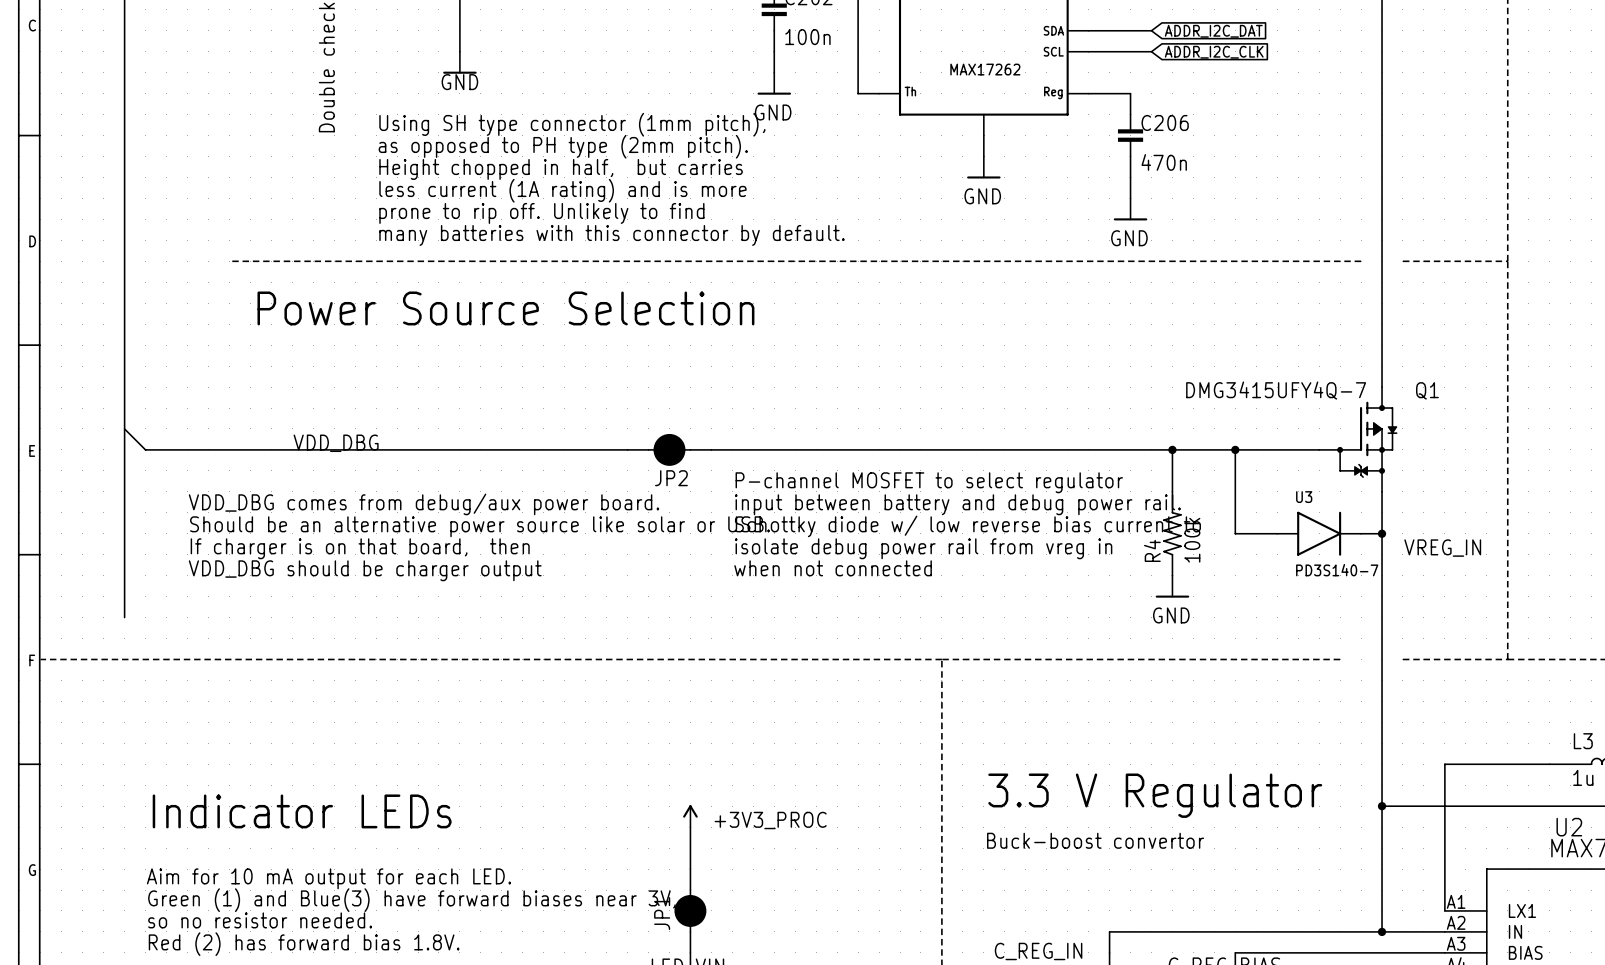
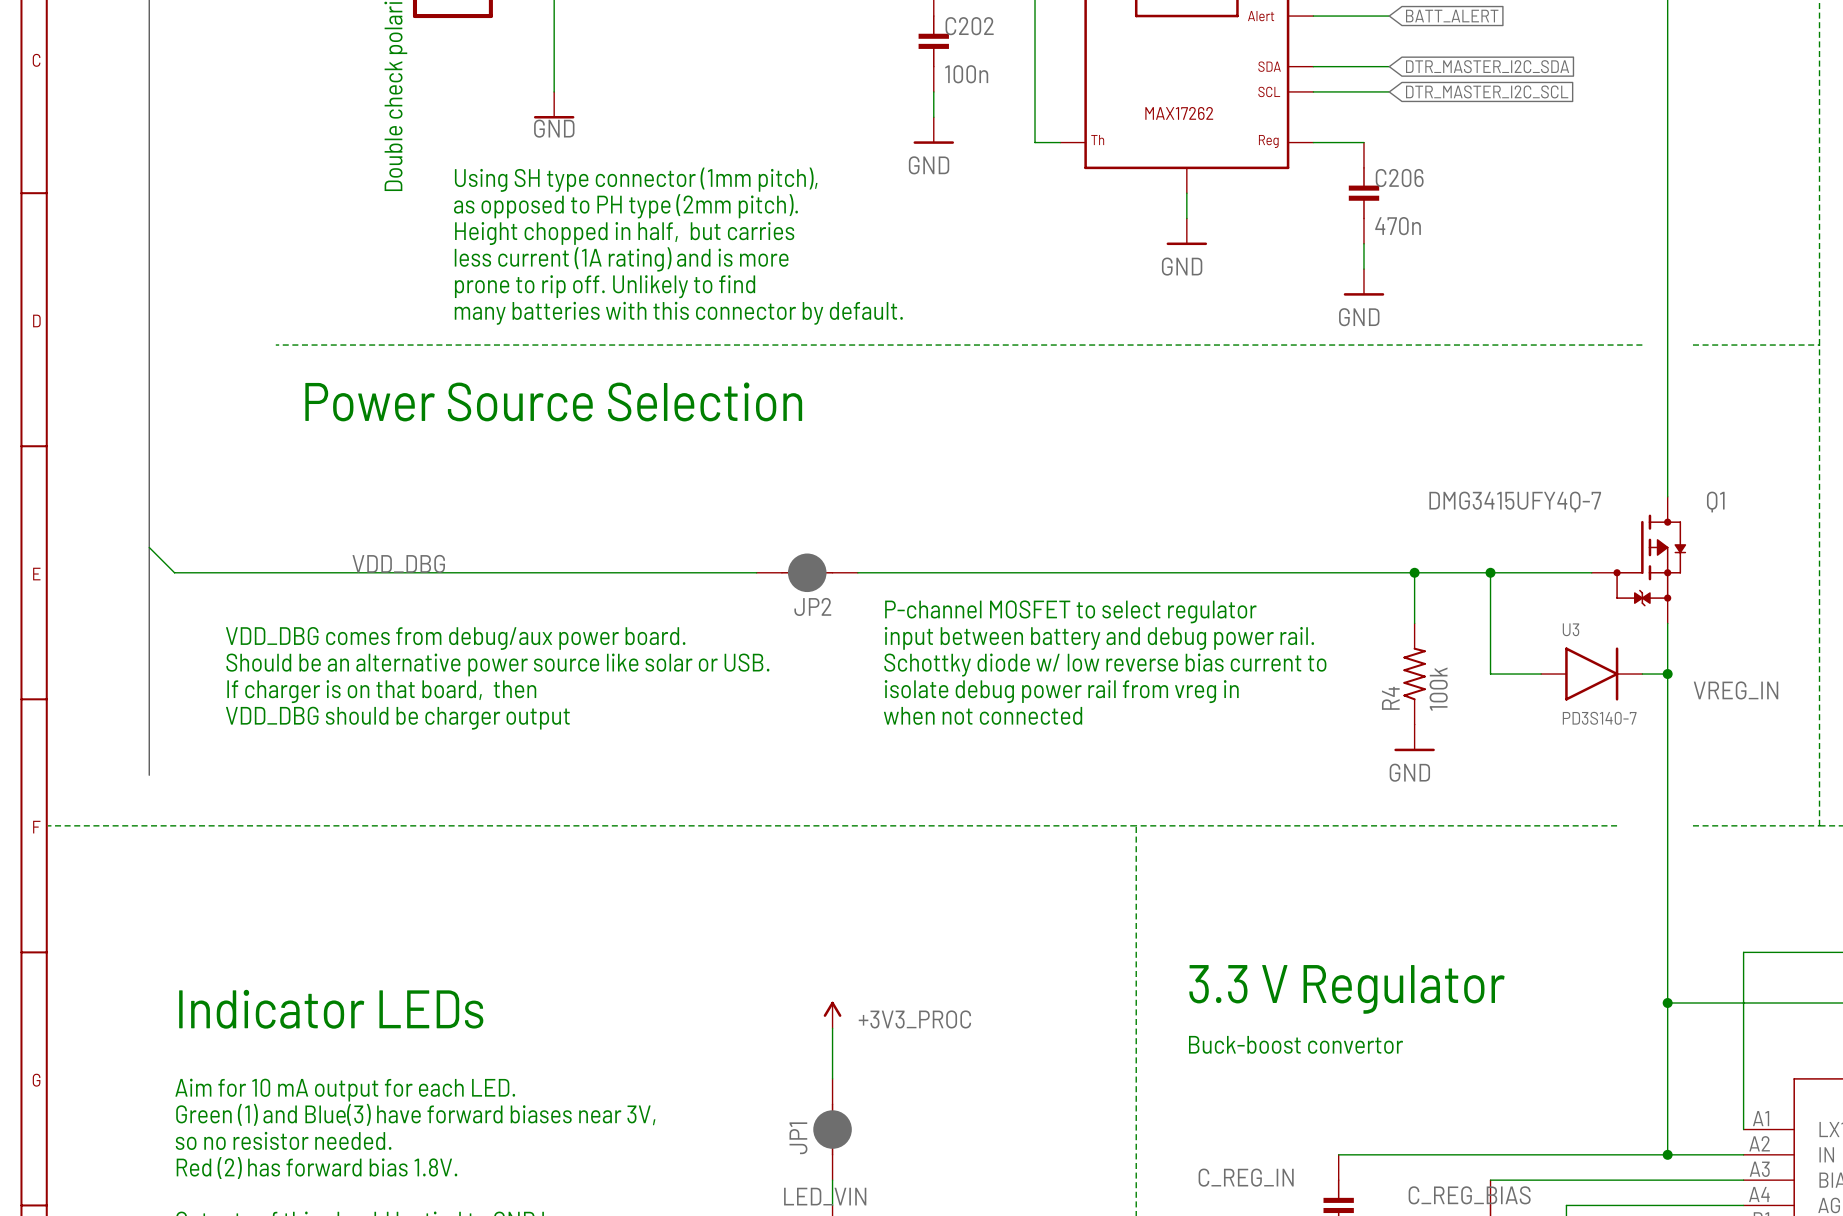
global label: ADDR_I2C_DAT (1213, 31) -> DTR_MASTER_I2C_SDA (1487, 66)
global label: ADDR_I2C_CLK (1214, 52) -> DTR_MASTER_I2C_SCL (1487, 91)

